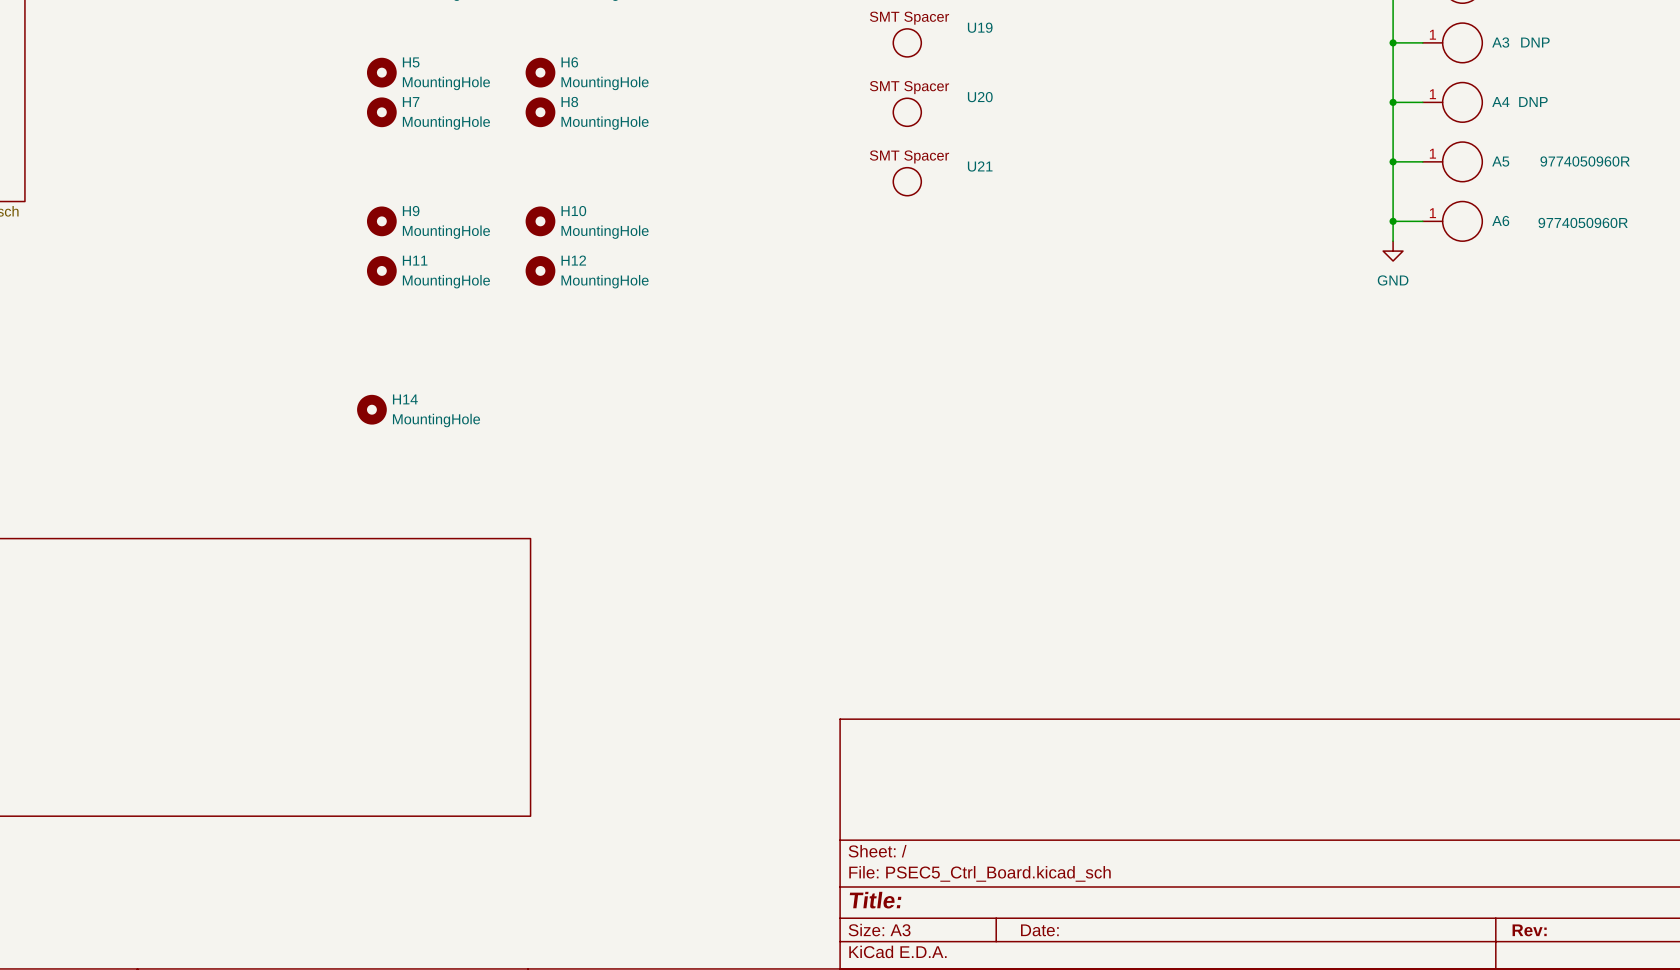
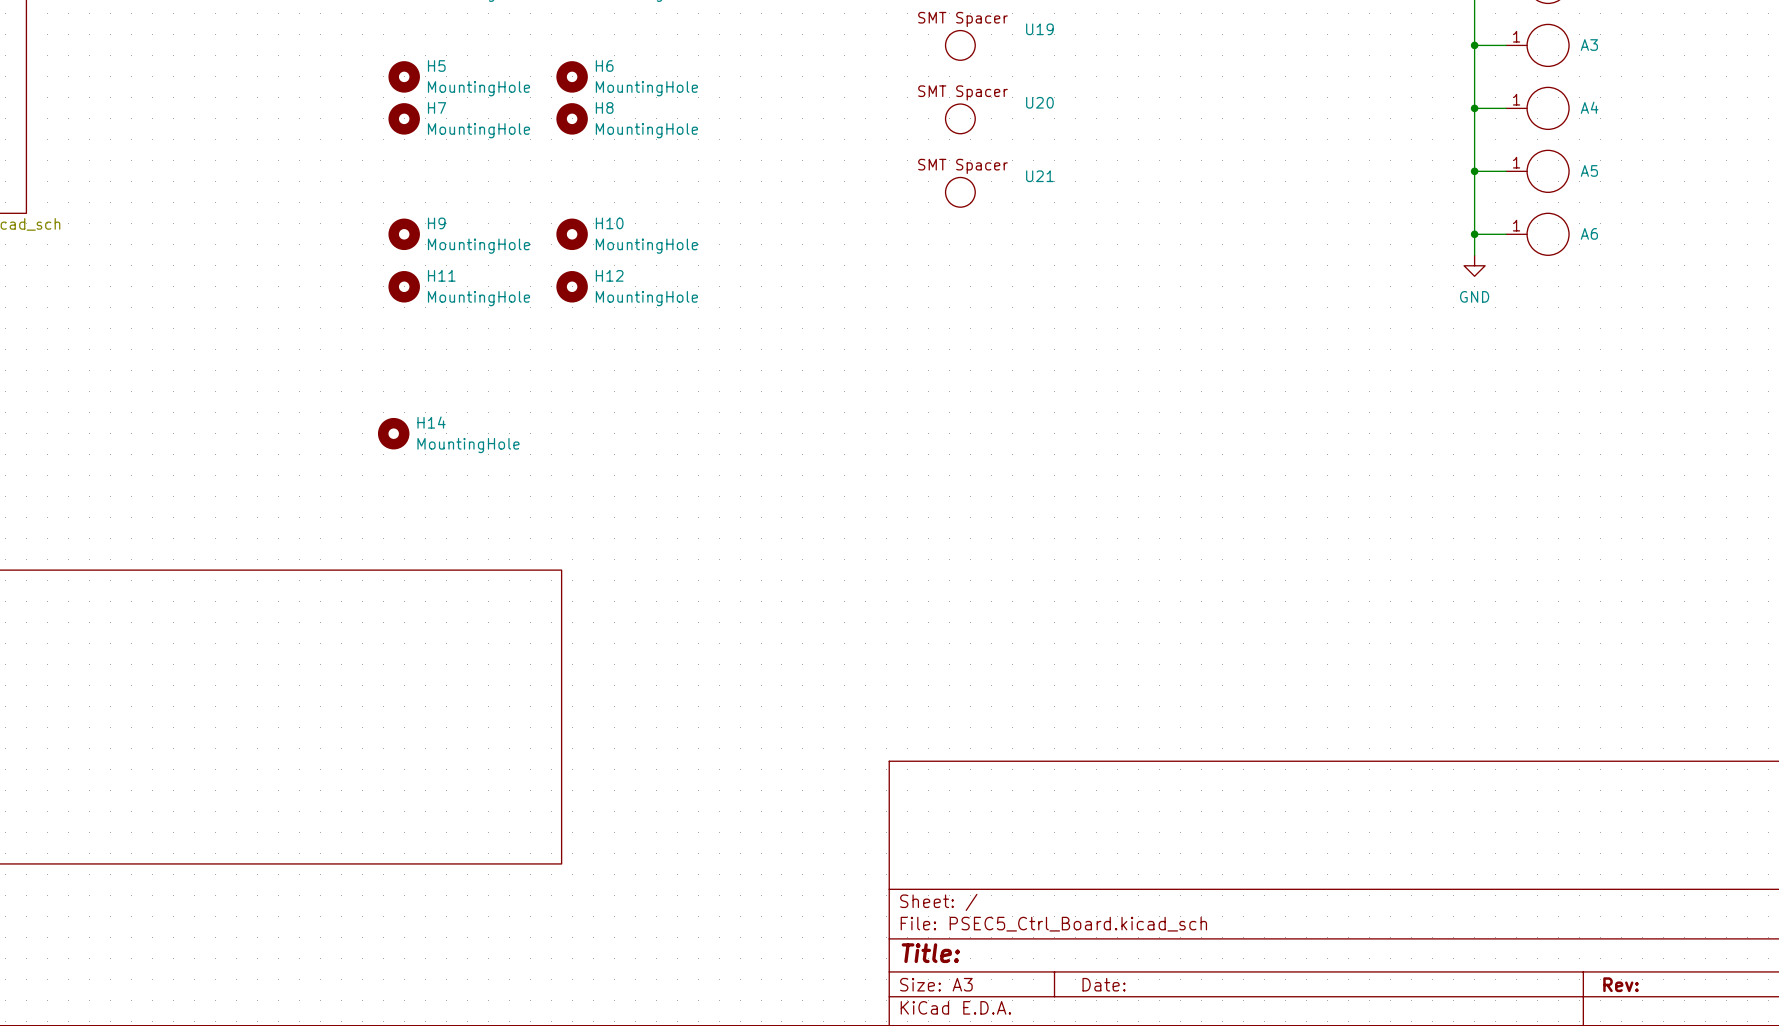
A3 value: DNP (1535, 42) -> none
A4 value: DNP (1533, 102) -> none
A5 value: 9774050960R (1585, 161) -> none
A6 value: 9774050960R (1583, 222) -> none

